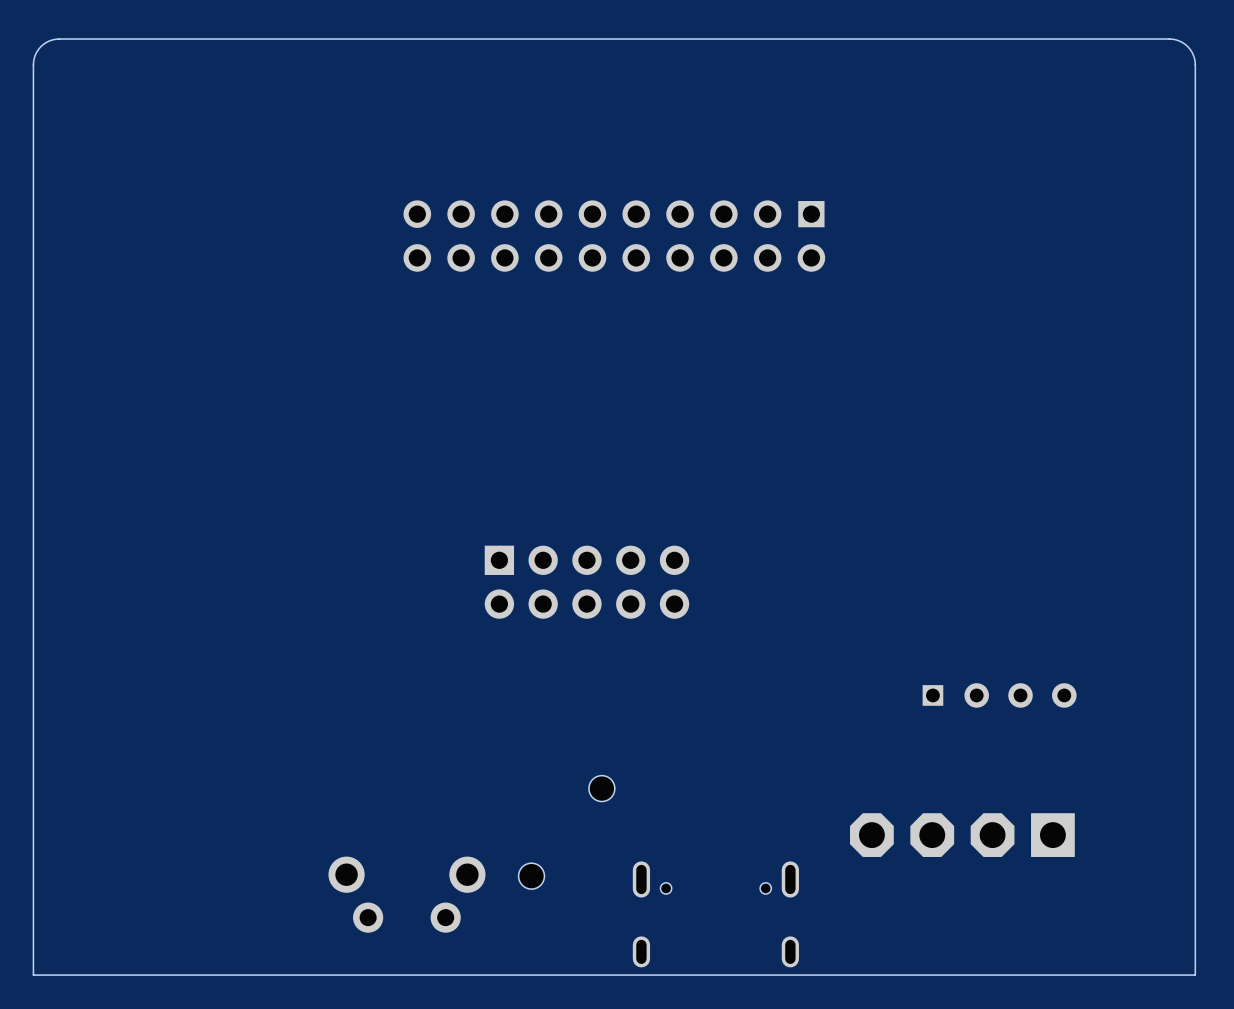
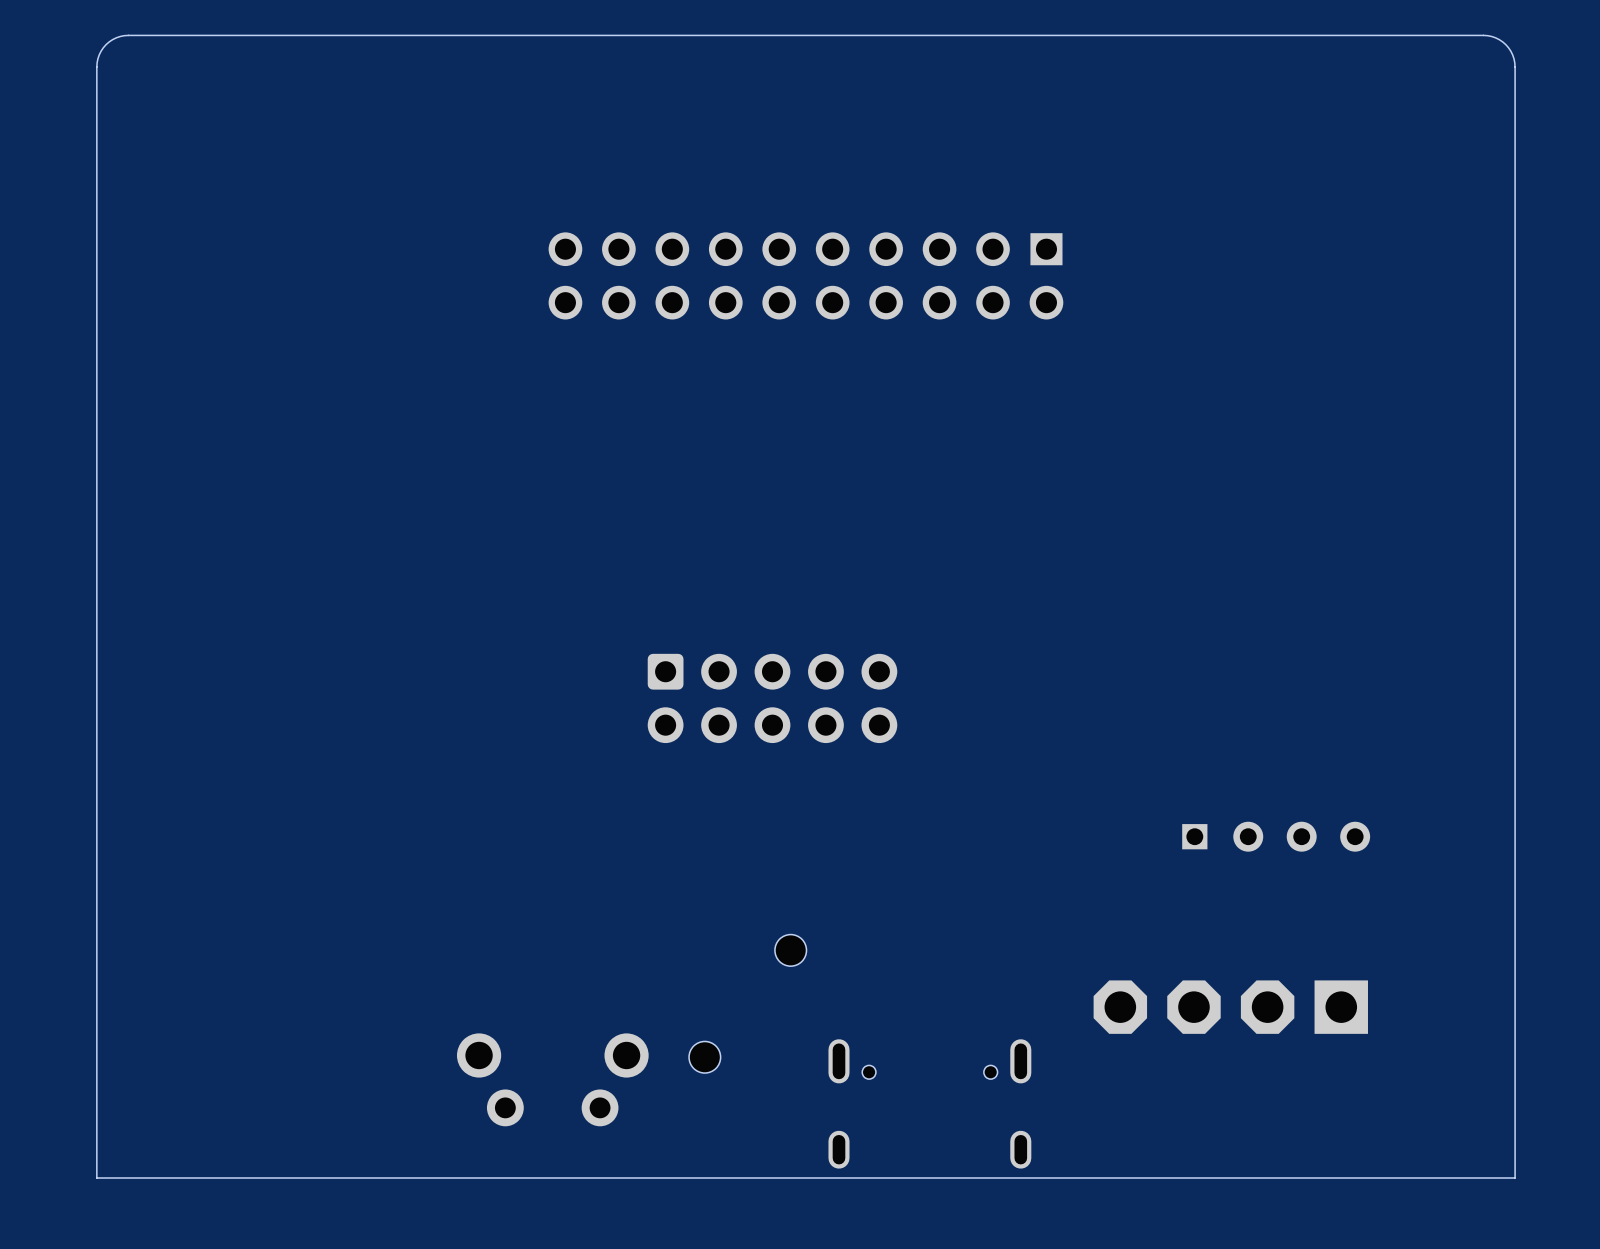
part footprint: [484, 545, 690, 619] -> [647, 653, 898, 744]

